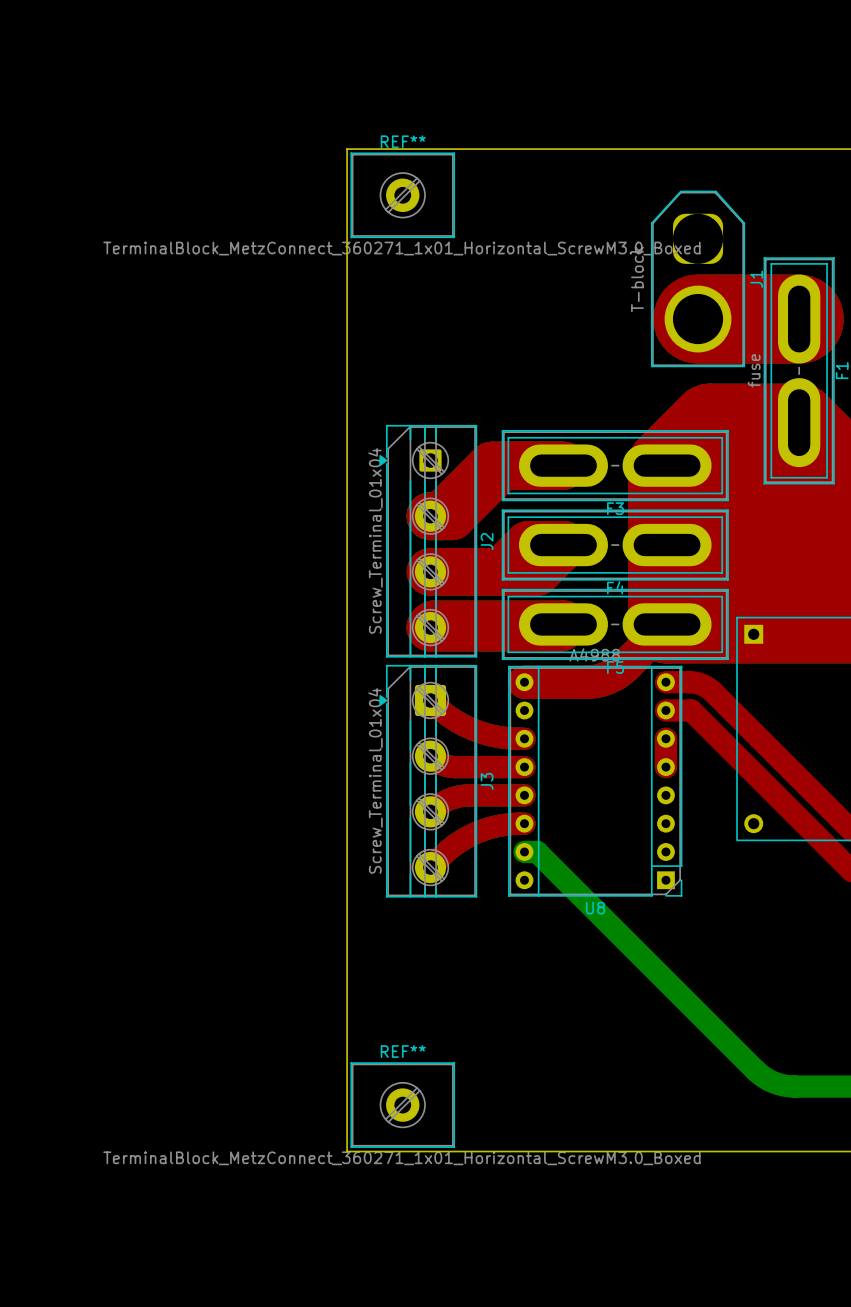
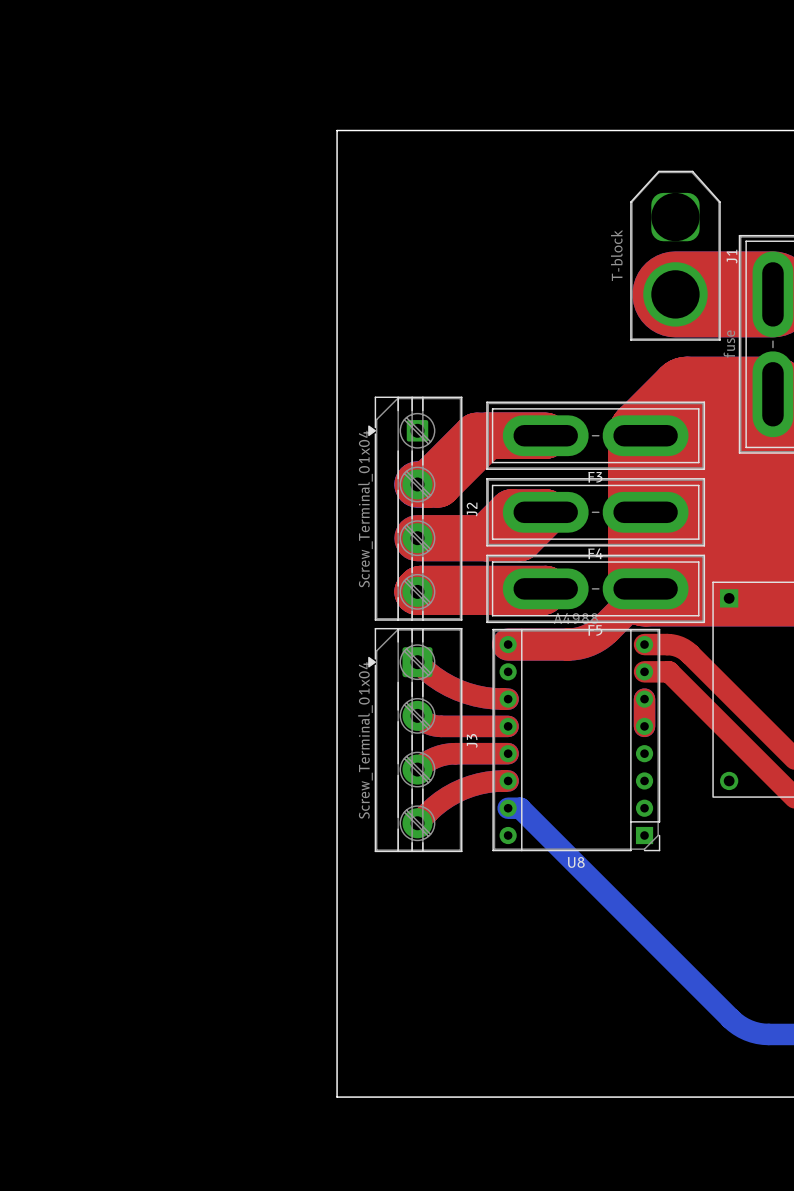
REF**: TerminalBlock_MetzConnect_360271_1x01_Horizontal_ScrewM3.0_Boxed (402, 195) -> none
REF**: TerminalBlock_MetzConnect_360271_1x01_Horizontal_ScrewM3.0_Boxed (402, 1105) -> none

